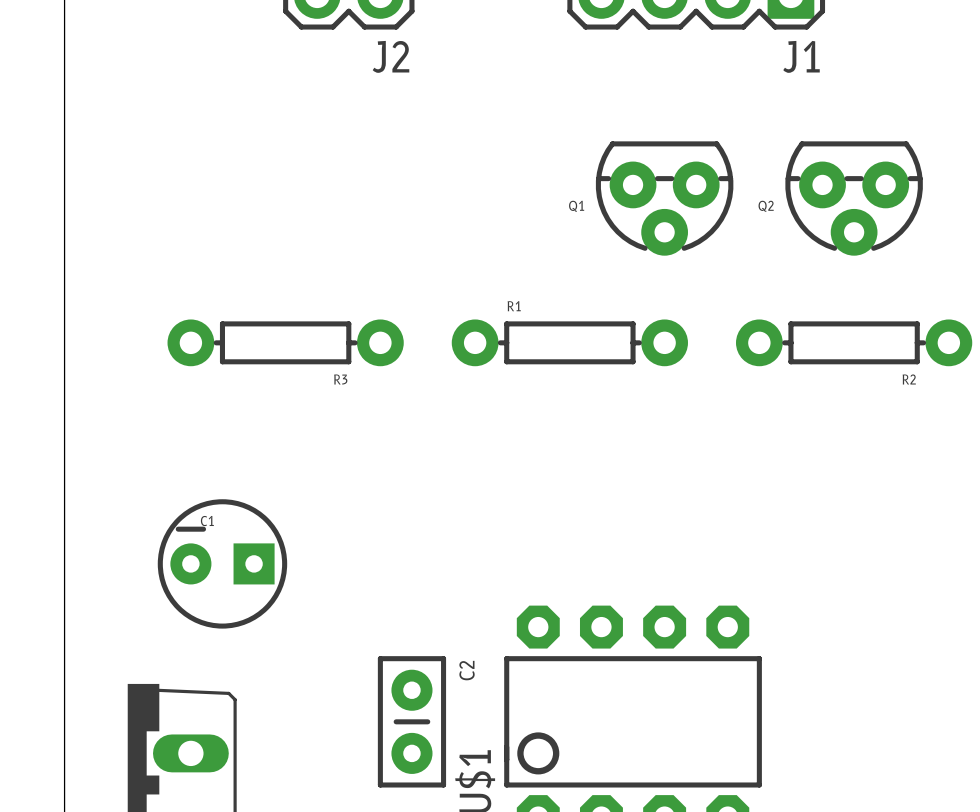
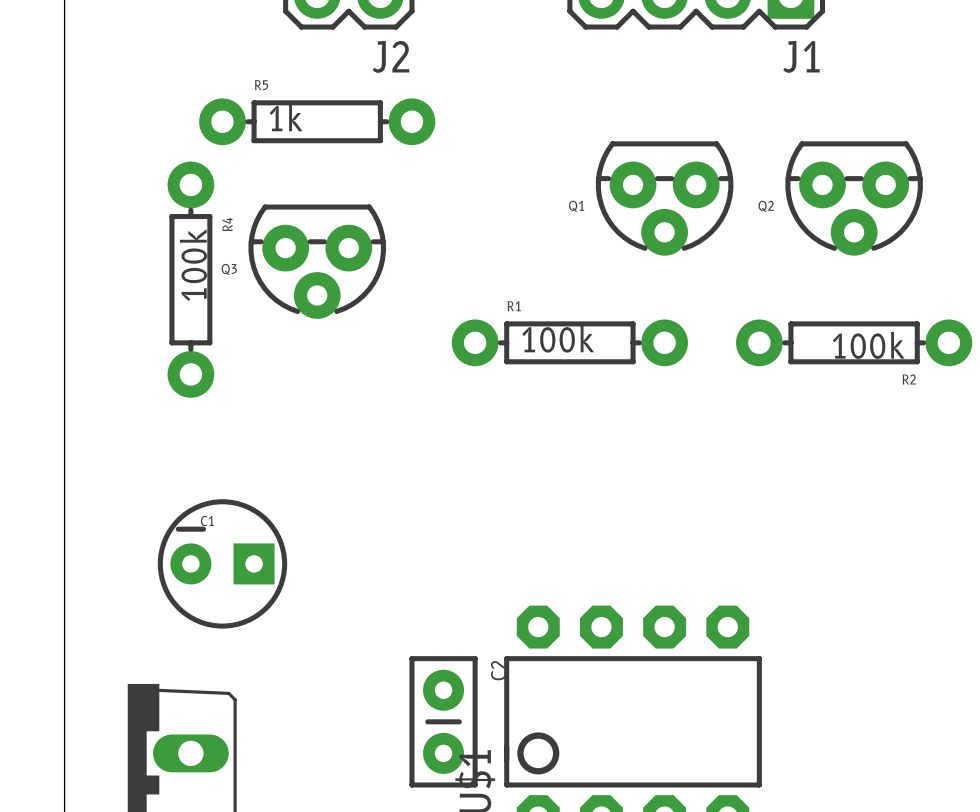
R5: none -> 1k (317, 121)
Q3: none -> (317, 261)
R4: none -> 100k (190, 279)
R1 value: none -> 100k (558, 338)
R3: (285, 342) -> none
R2 value: none -> 100k (868, 345)
C2 position: (411, 721) -> (443, 721)

